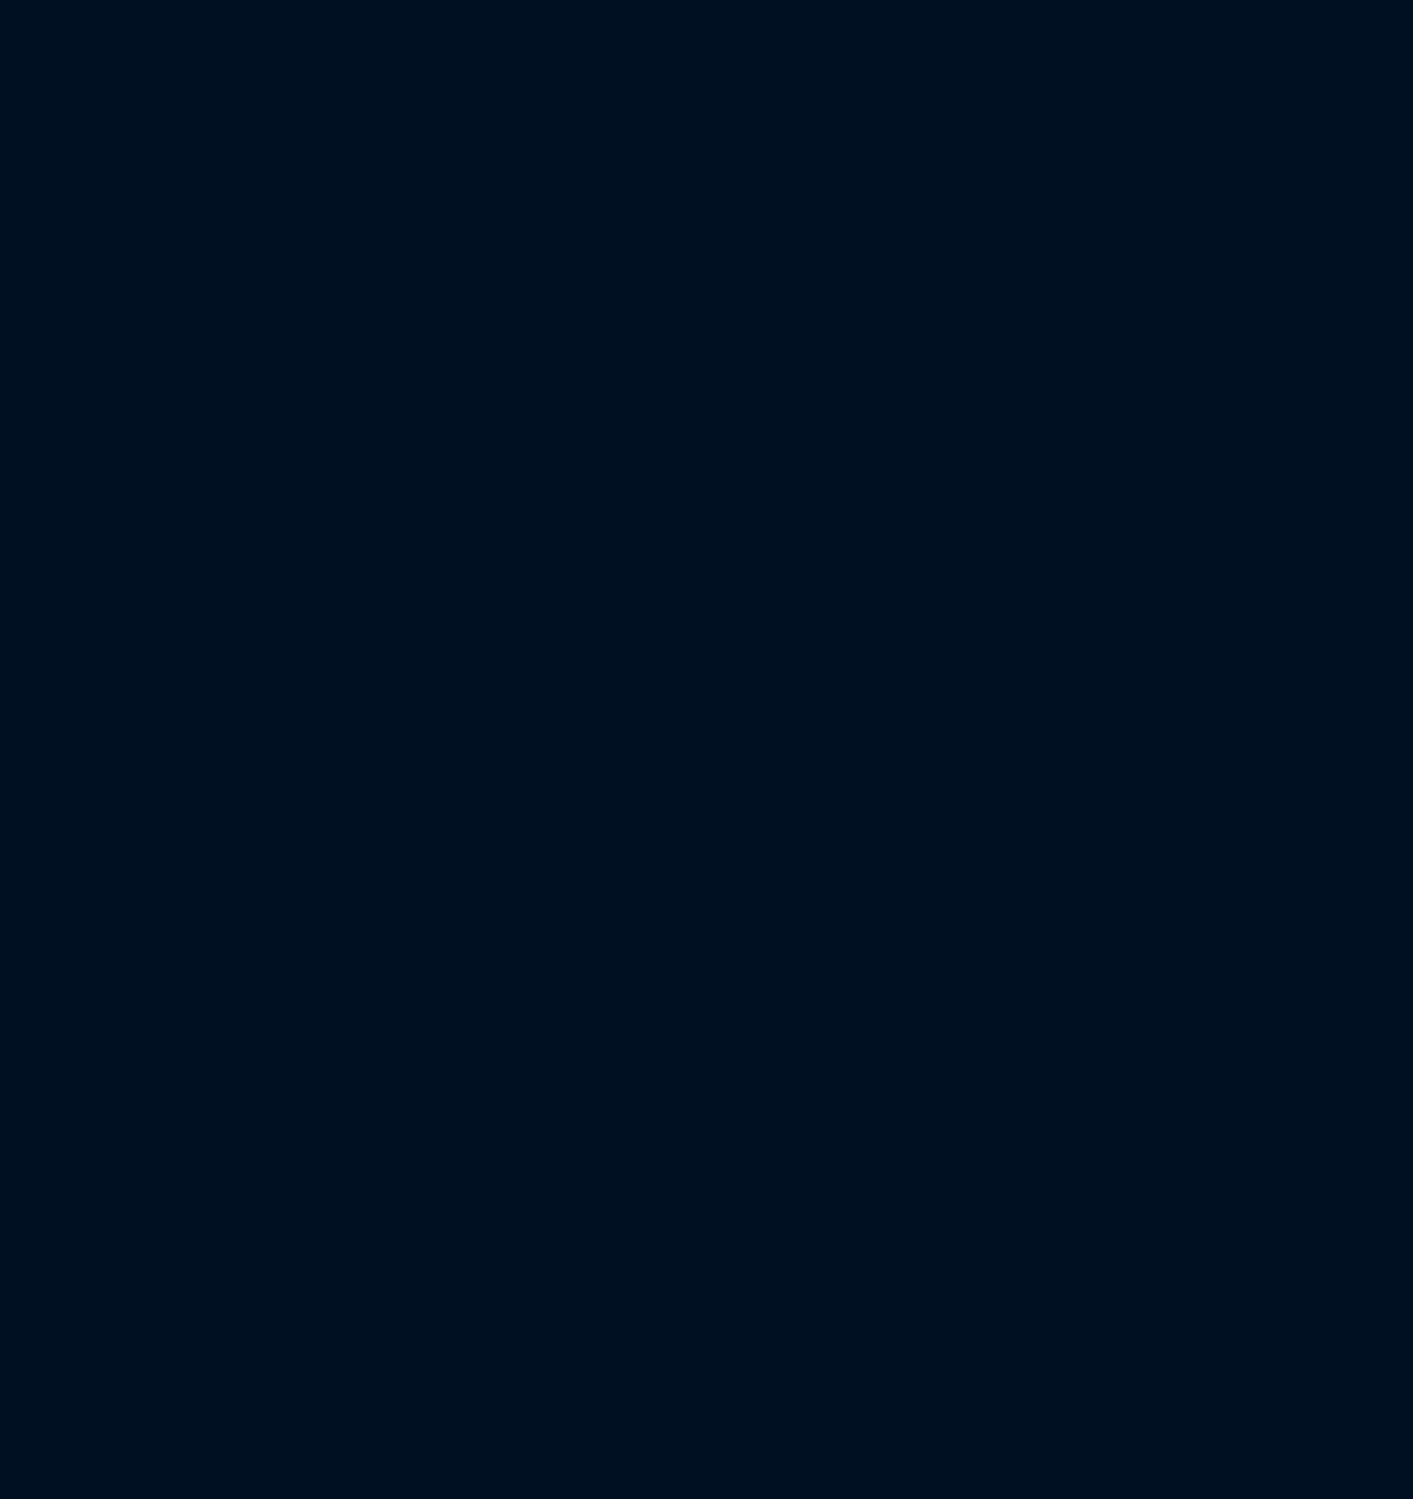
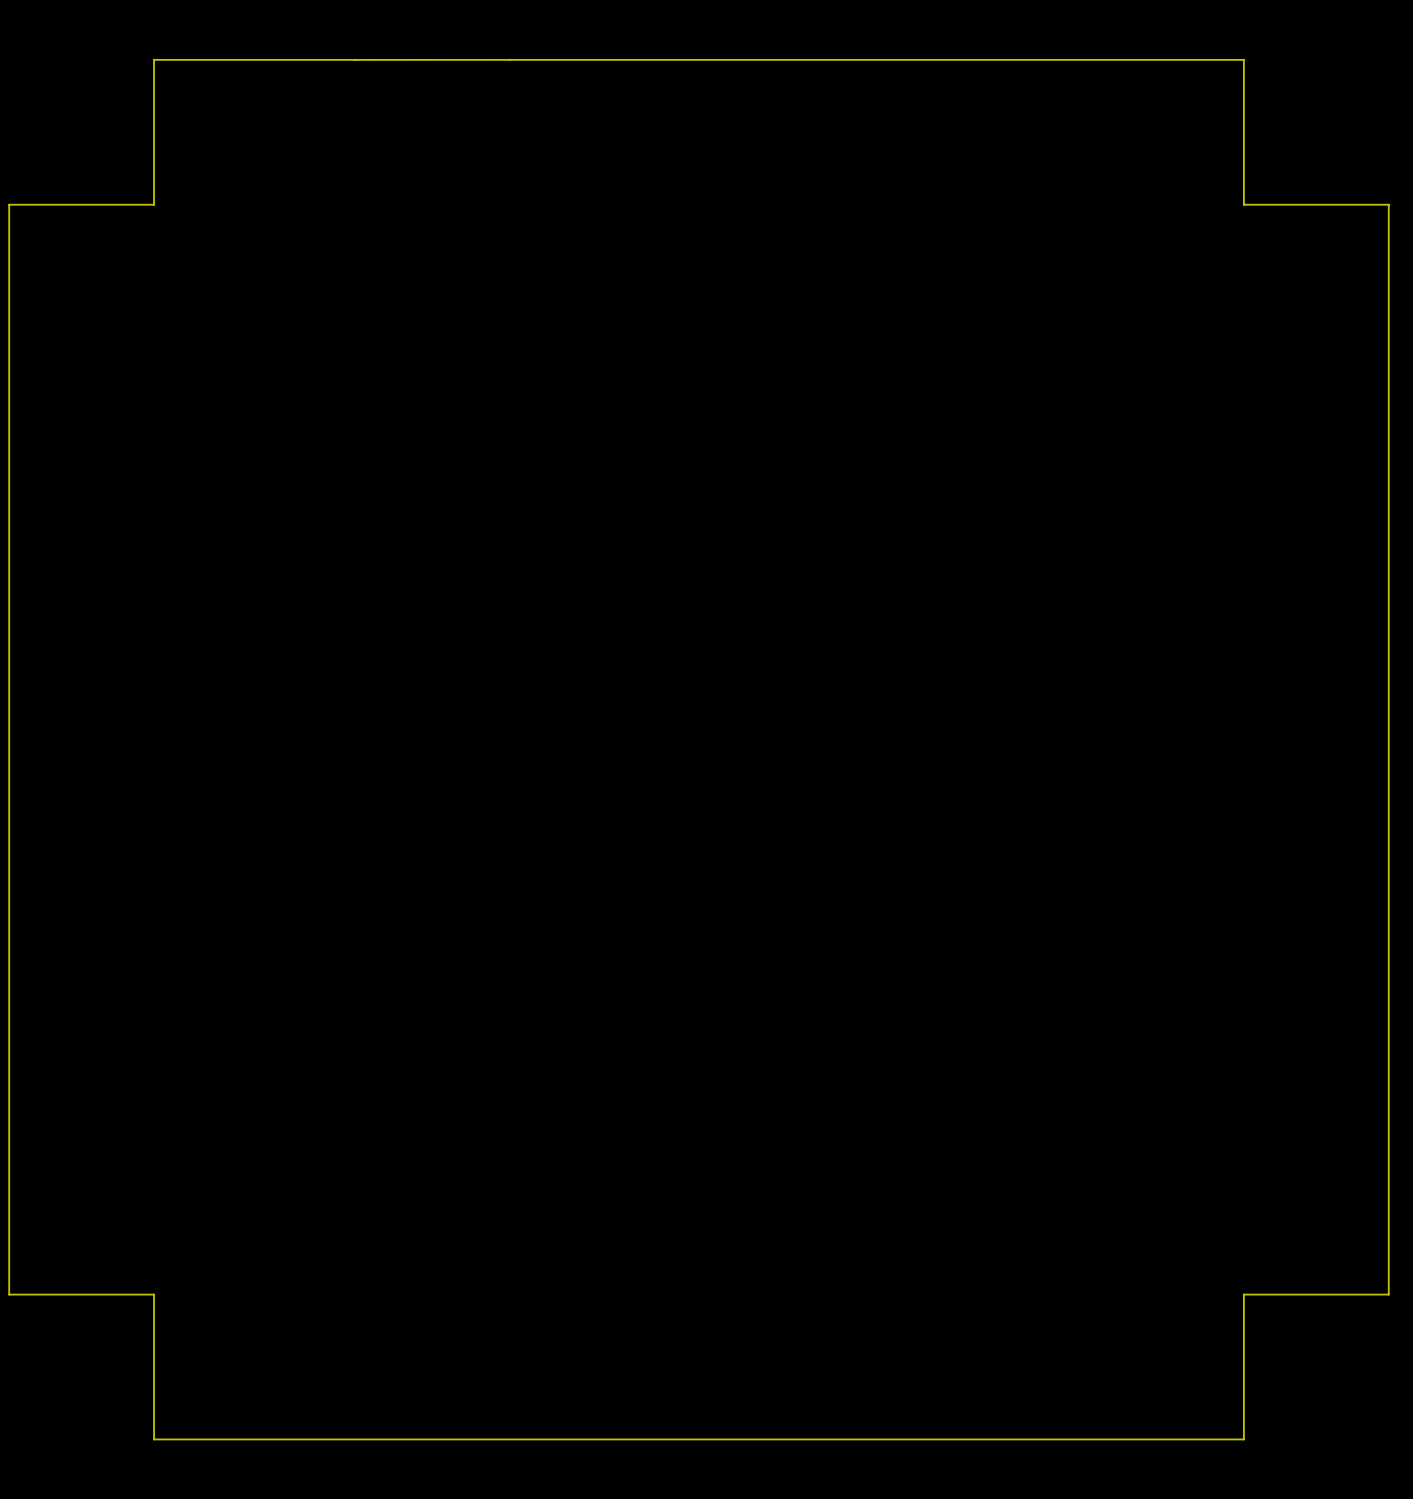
board edge: none -> (355, 59) (1243, 59) (1243, 204) (1388, 204) (1388, 1294) (1243, 1294) (1243, 1439) (154, 1439) (154, 1294) (9, 1294) (9, 204) (154, 204) (154, 59) (355, 59)

